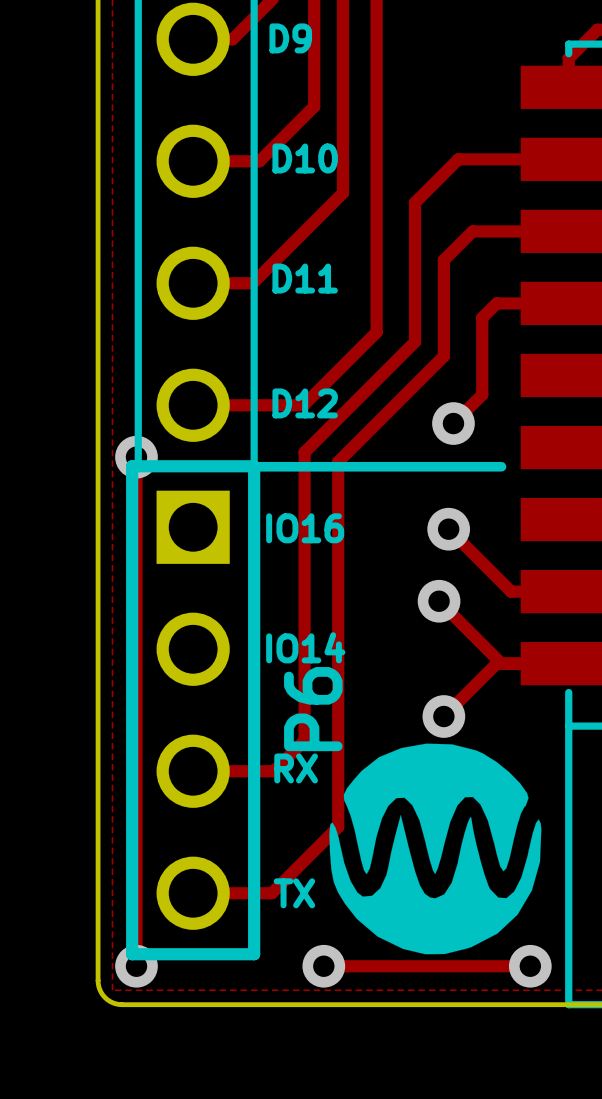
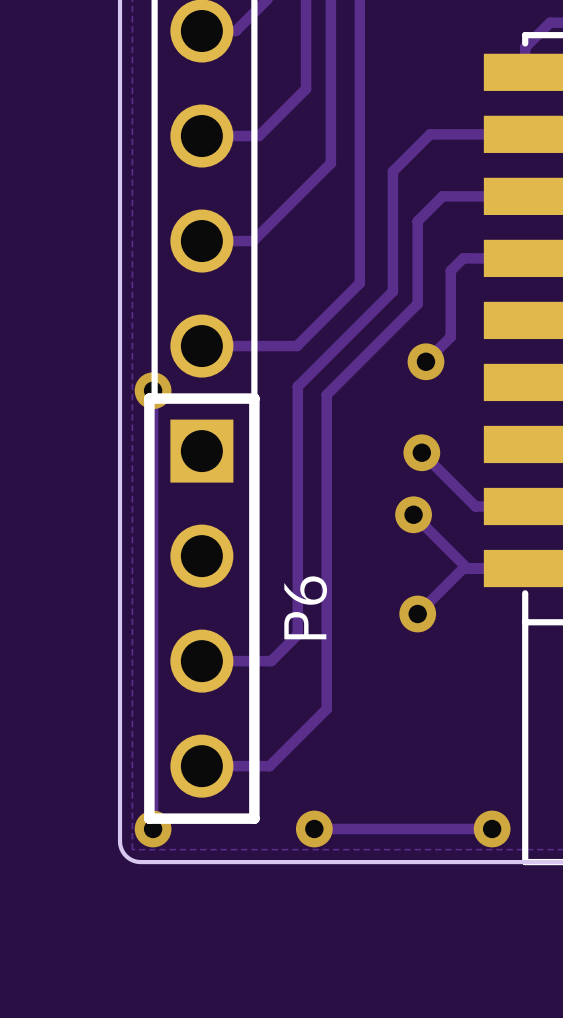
text: D9 (290, 38) -> none
text: D10 (305, 158) -> none
text: D11 (305, 278) -> none
text: D12 (305, 403) -> none
line: (165, 466) (501, 466) -> none
text: IO16 (305, 528) -> none
text: IO14 (305, 647) -> none
drawing: [329, 743, 542, 955] -> none
text: RX (296, 768) -> none
text: TX (294, 893) -> none

